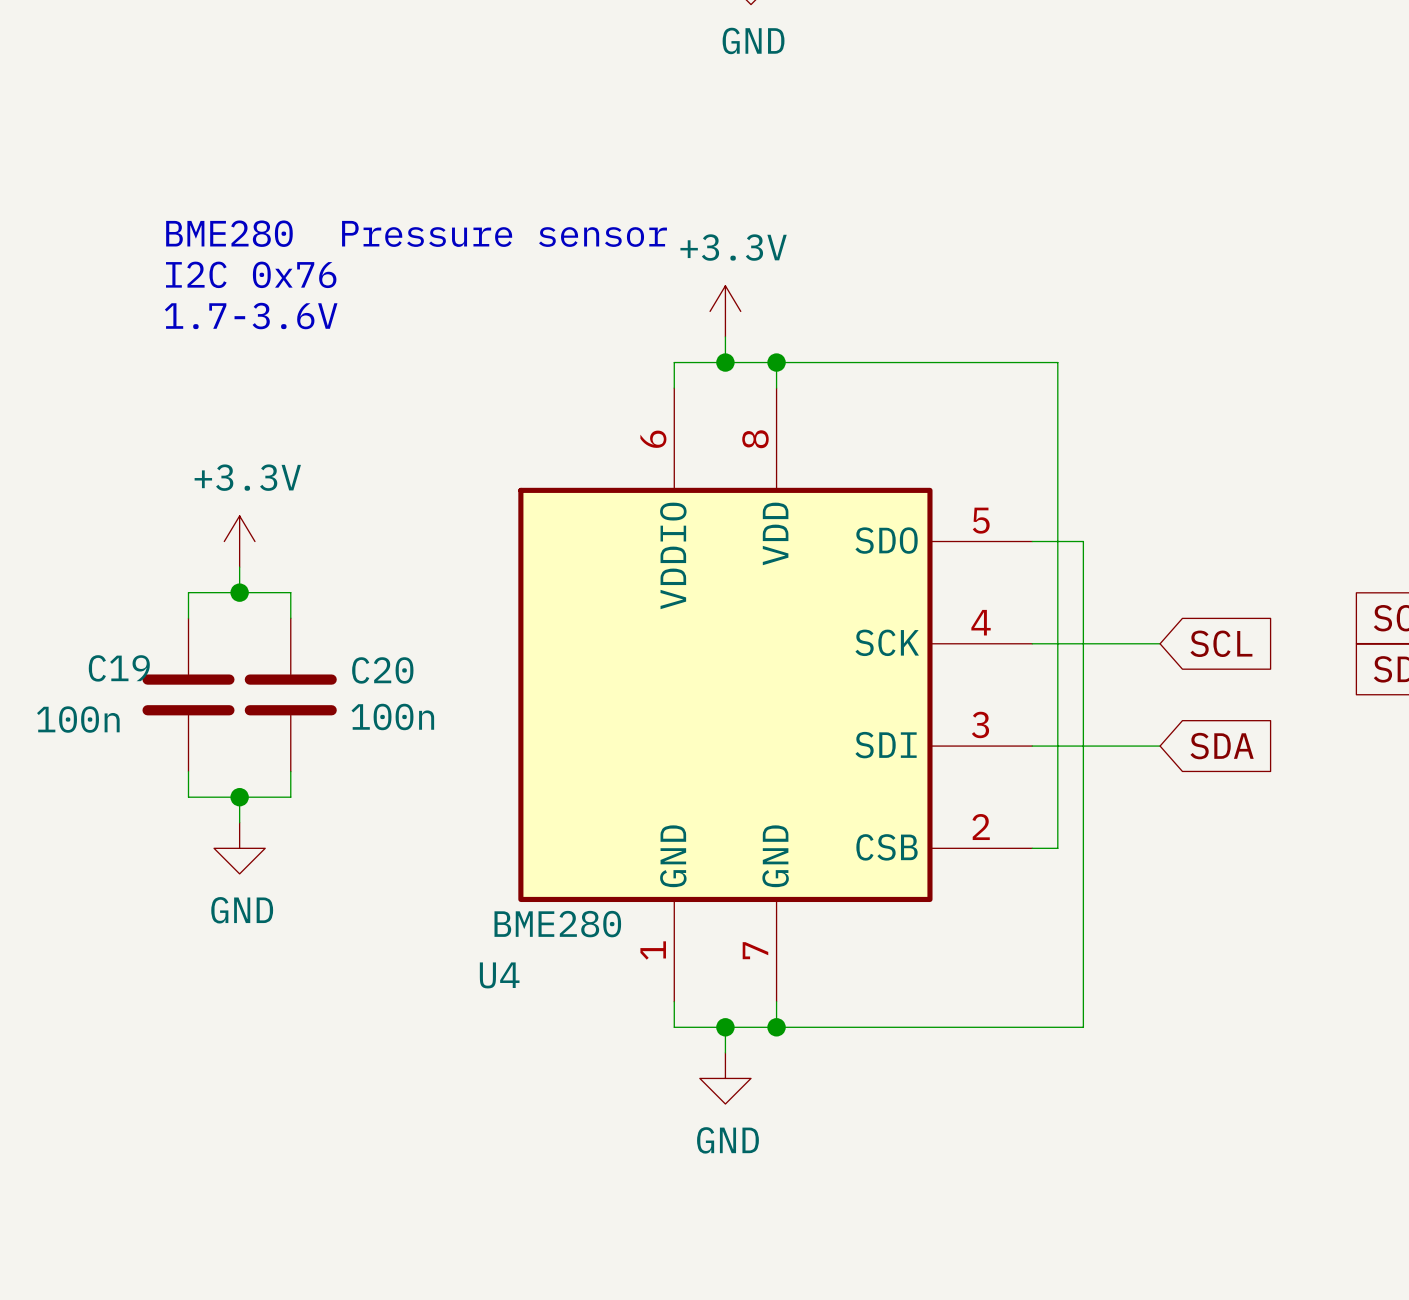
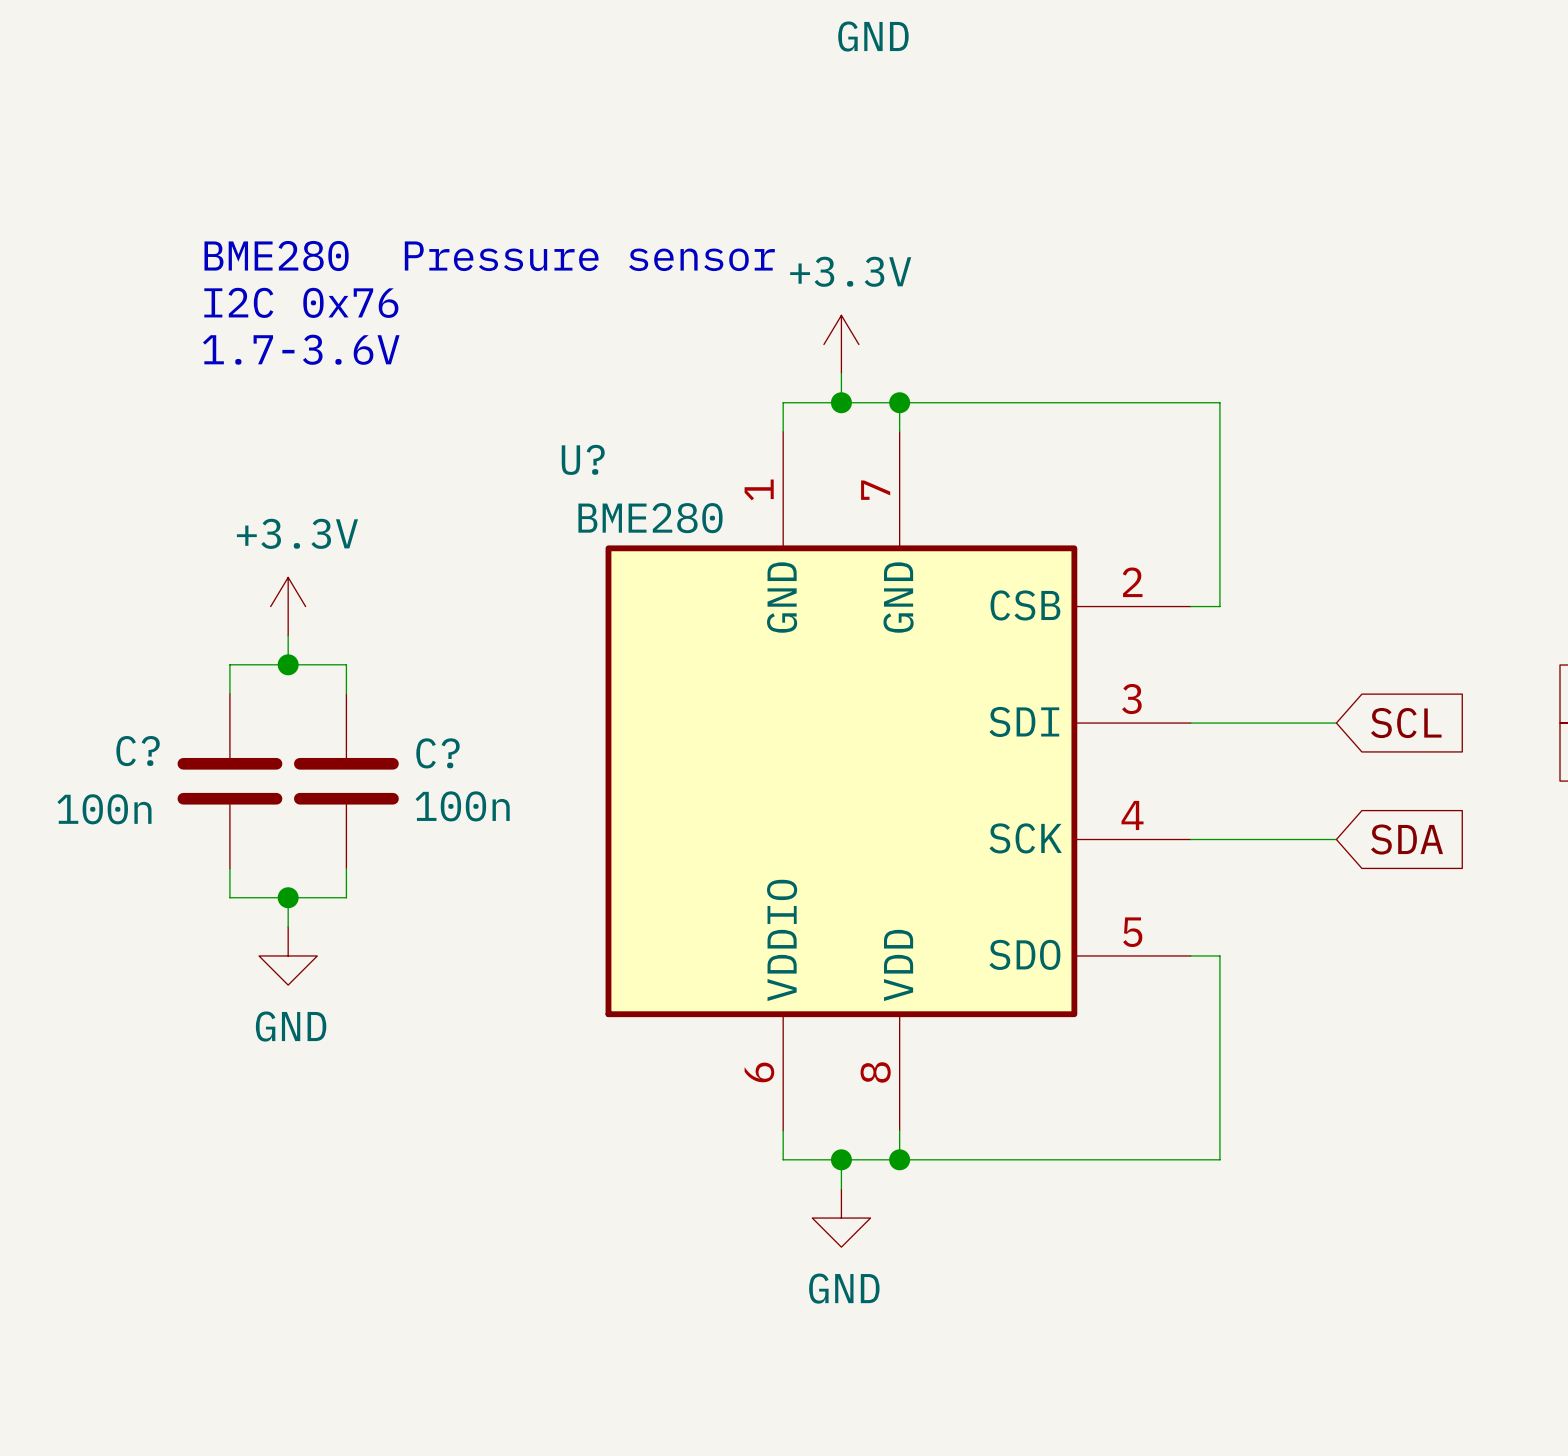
C19 name: C19 (119, 668) -> C? (138, 751)
C20 name: C20 (382, 670) -> C? (437, 753)
U4 flip: as is (725, 694) -> up-down (841, 781)
wire: (1057, 848) (1057, 541) (1083, 541) (1083, 1027) (1057, 1027) -> (1219, 955) (1219, 1159)
U4 name: U4 (499, 975) -> U? (583, 459)

